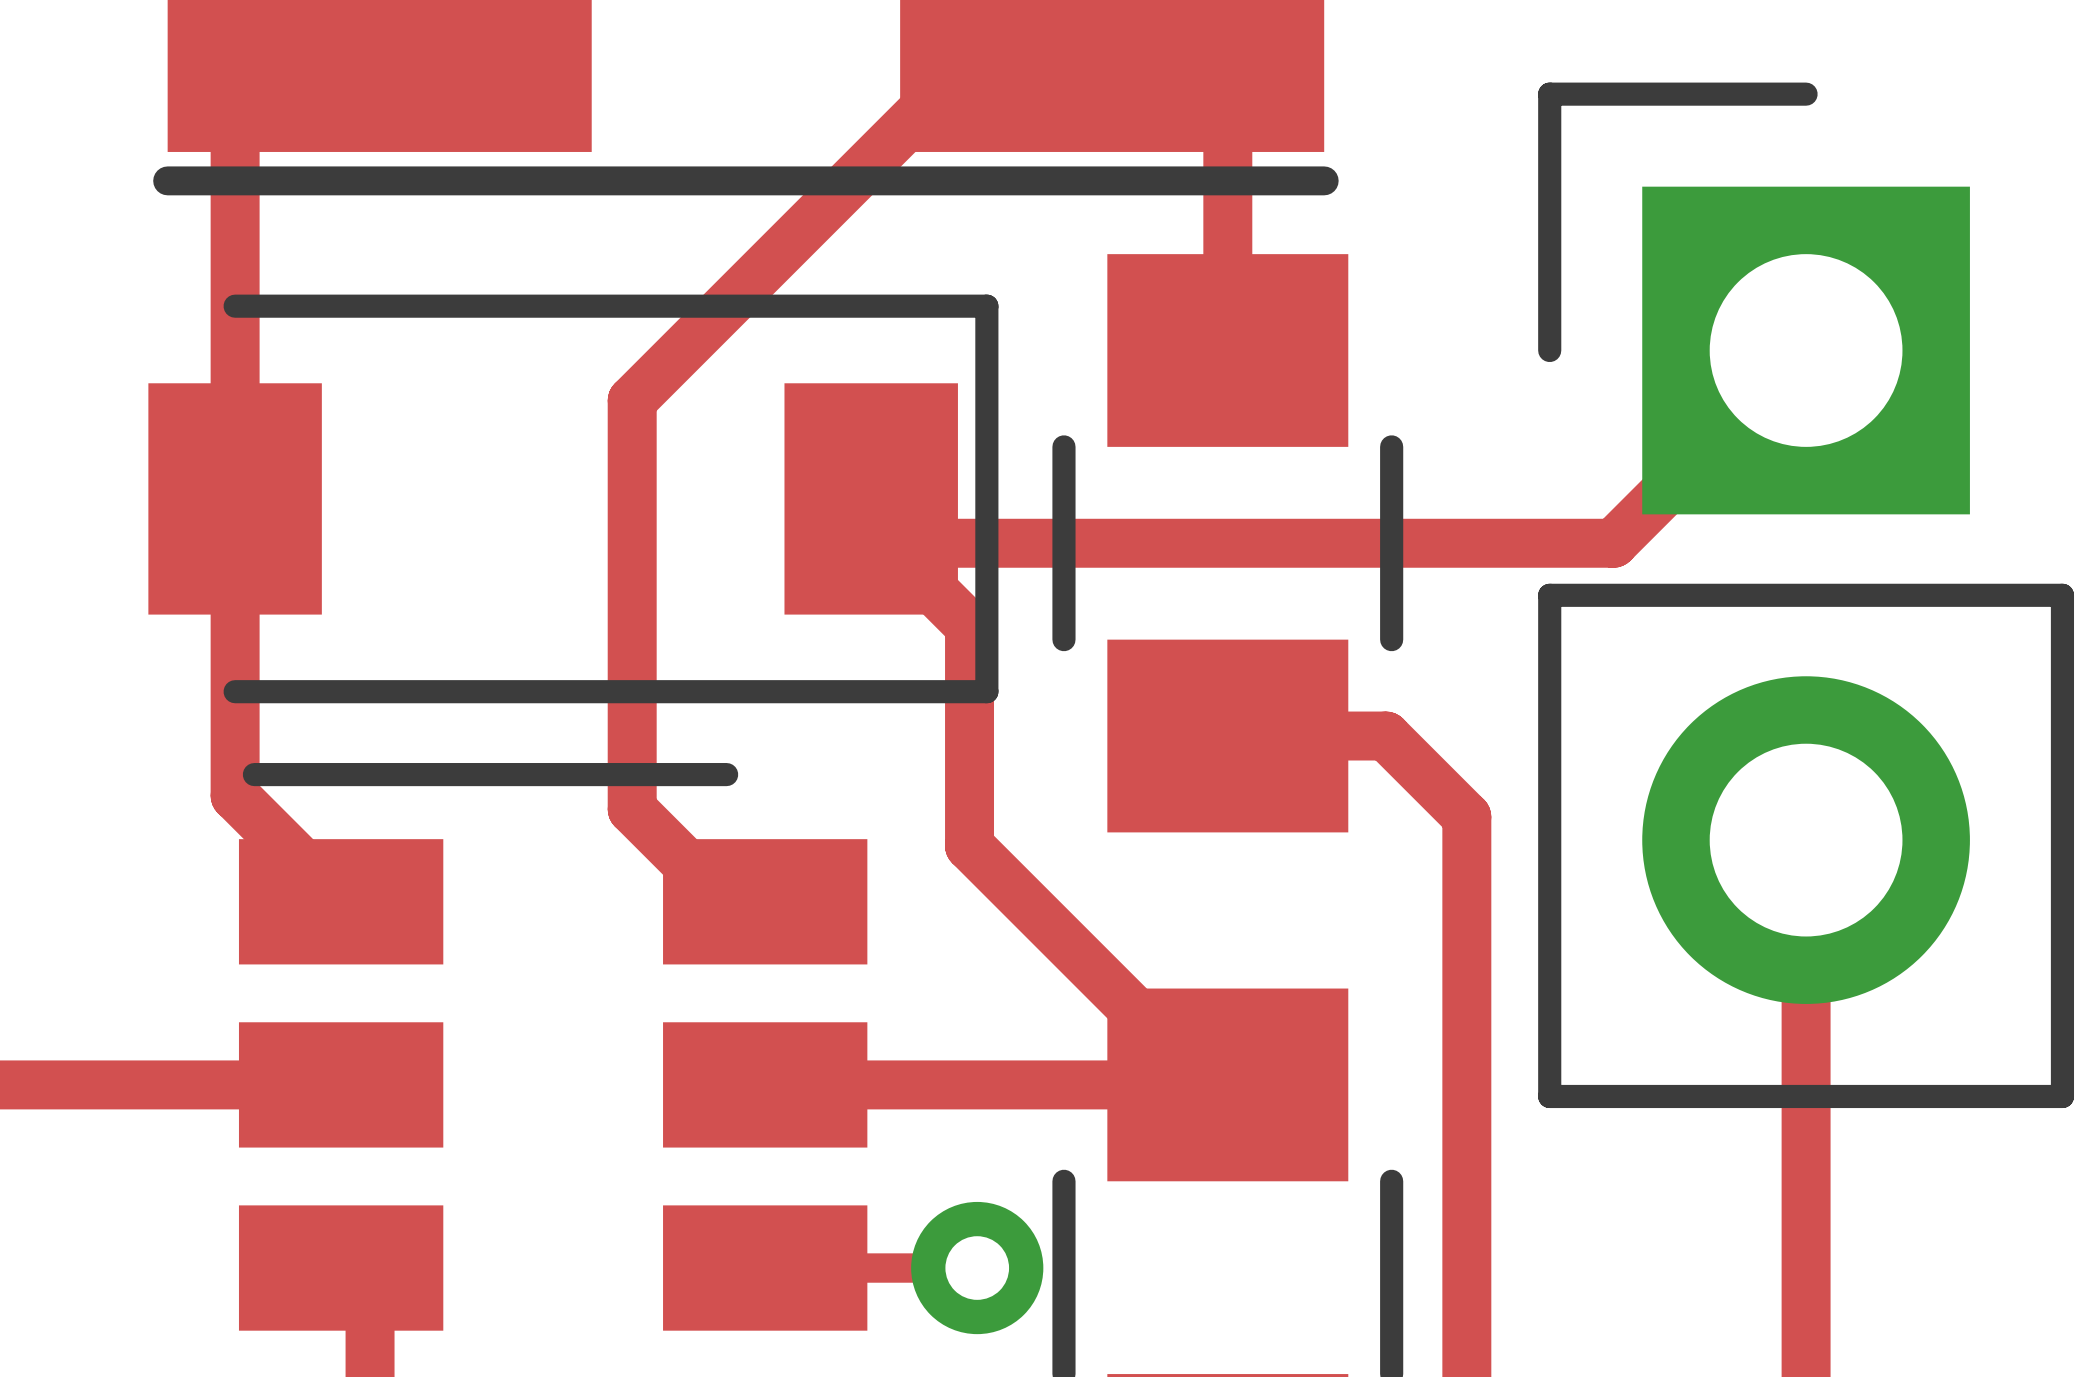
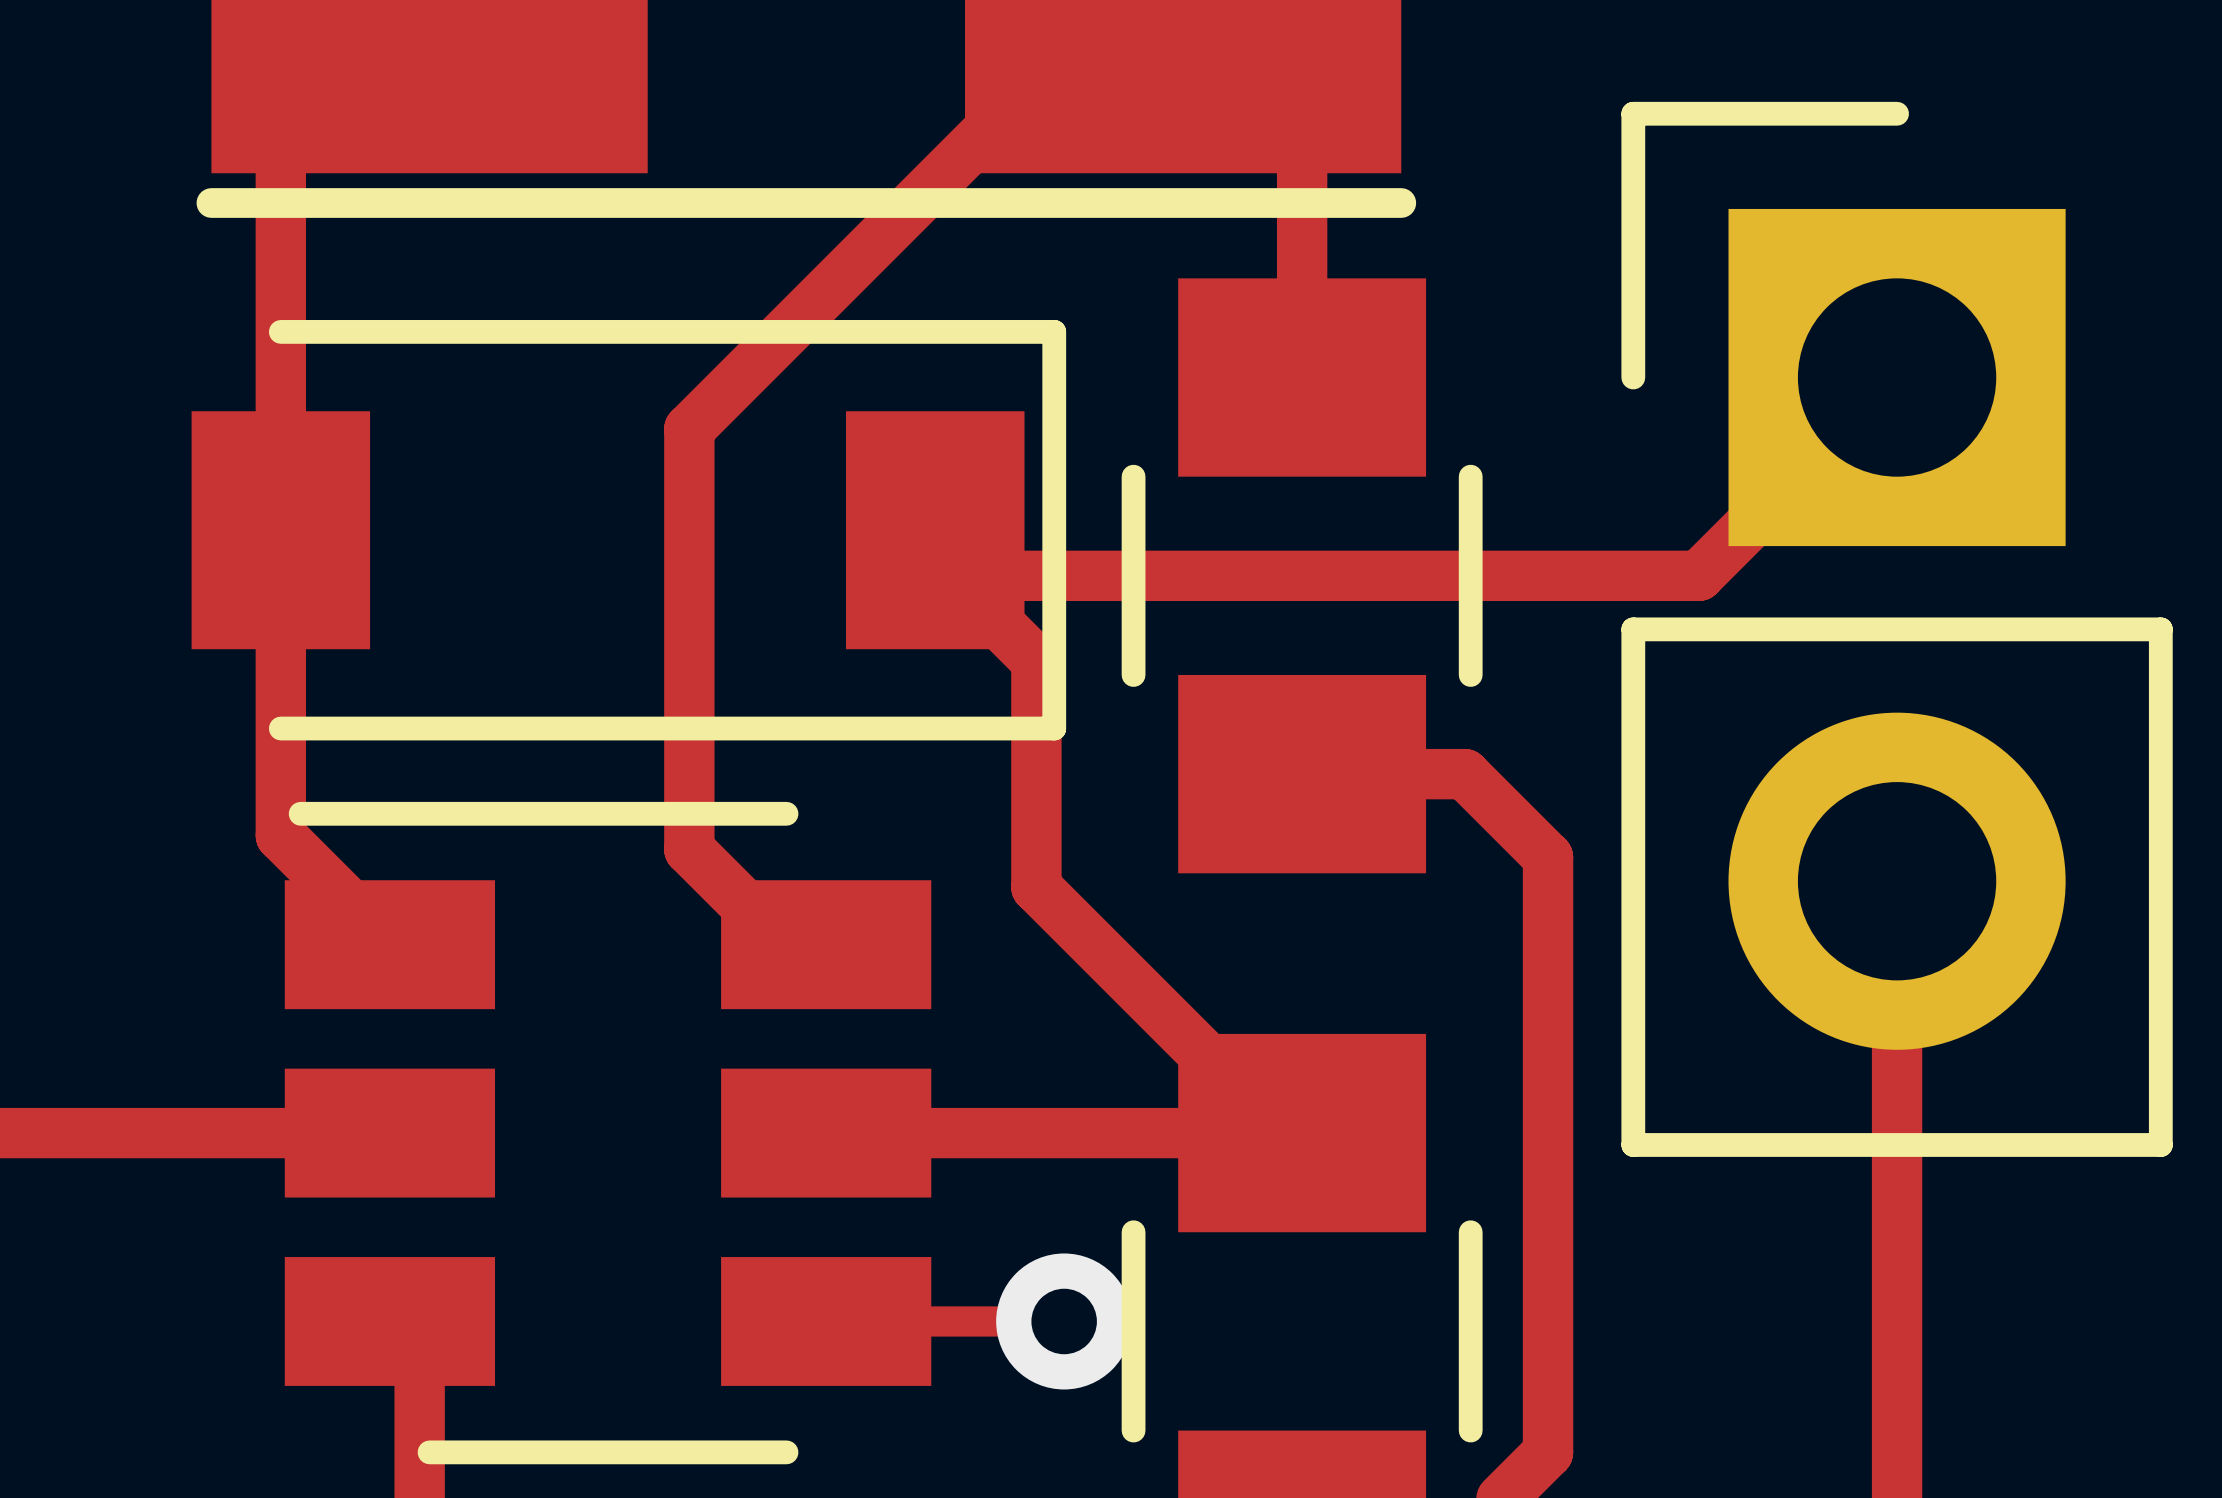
via position: (977, 1268) -> (1064, 1321)

